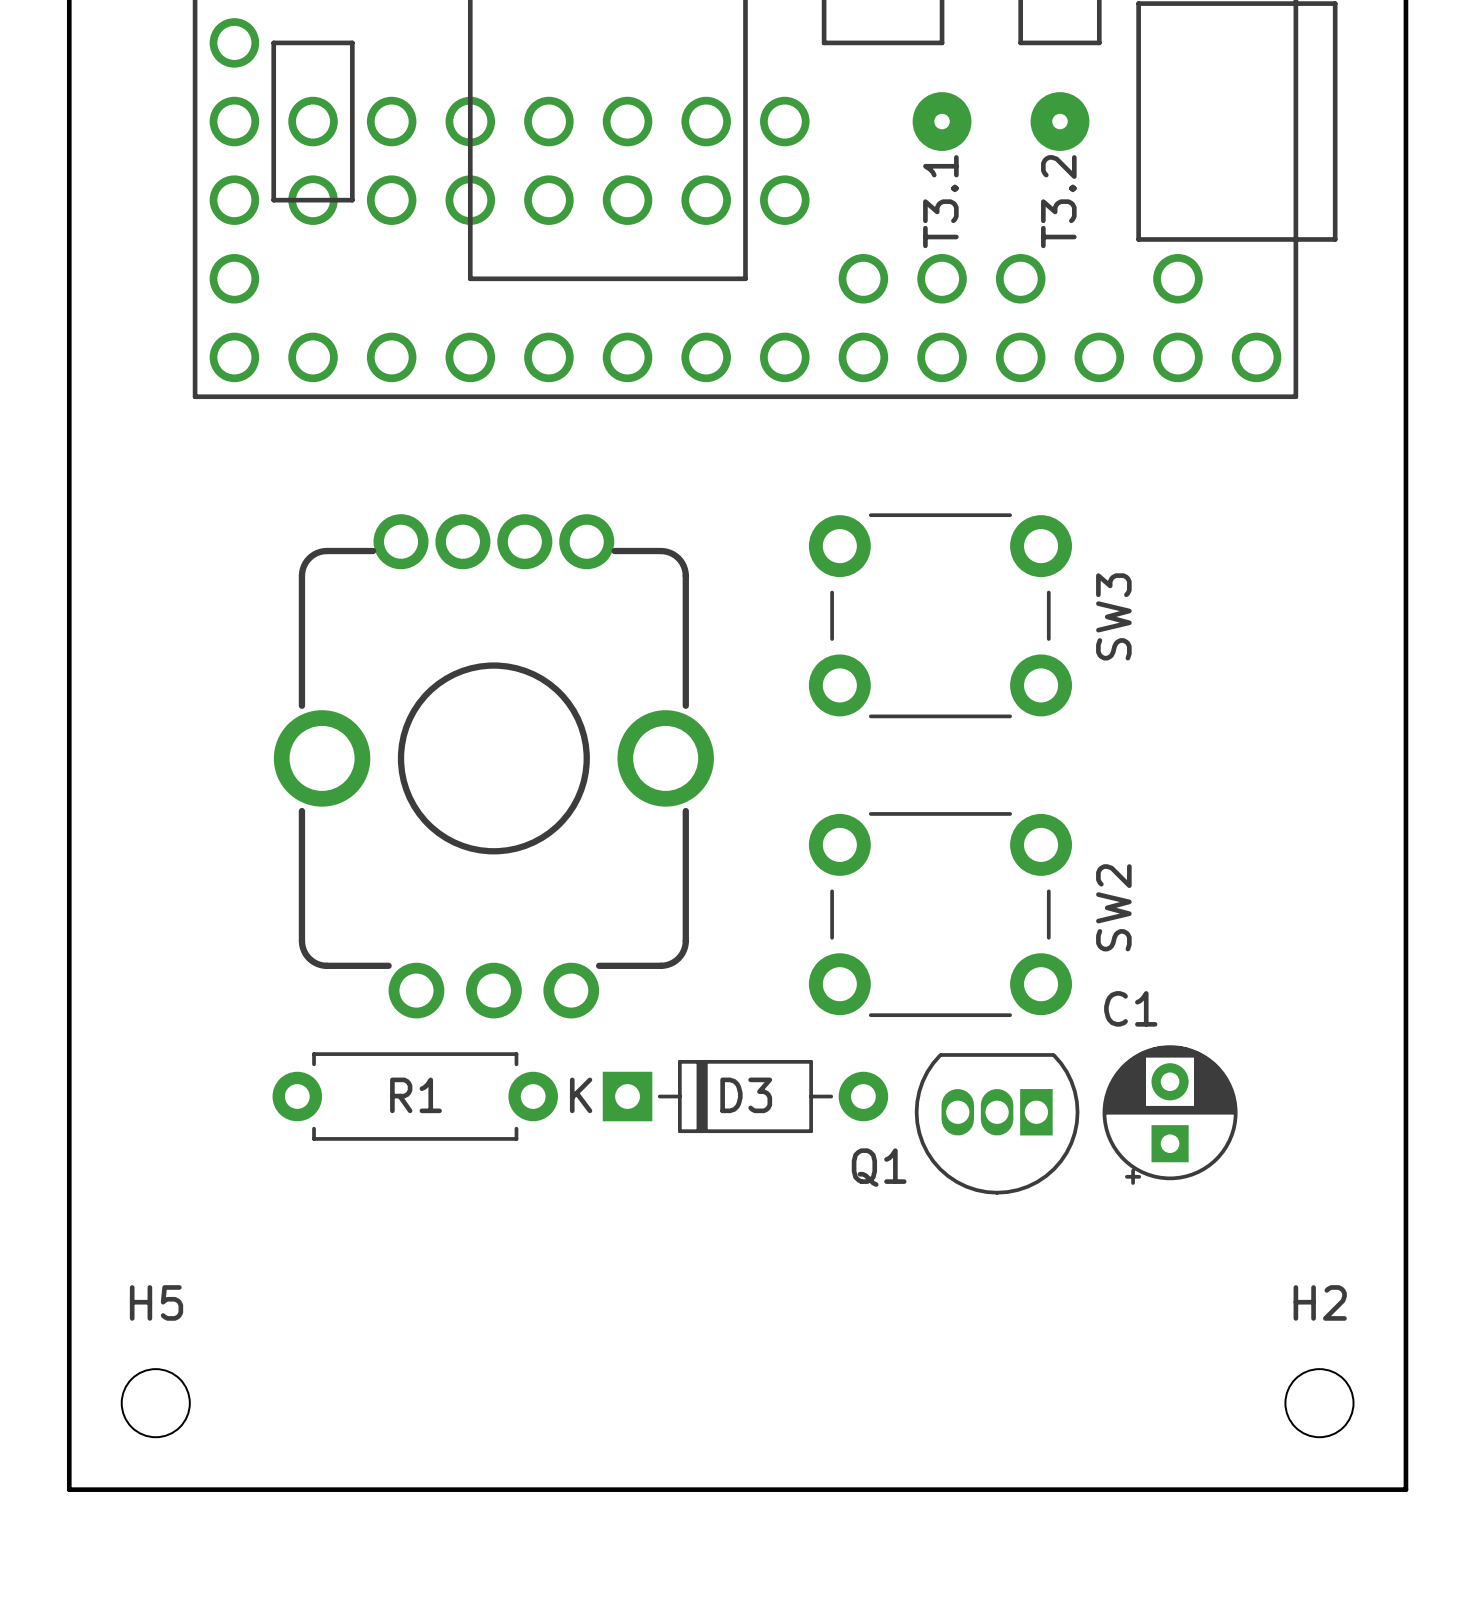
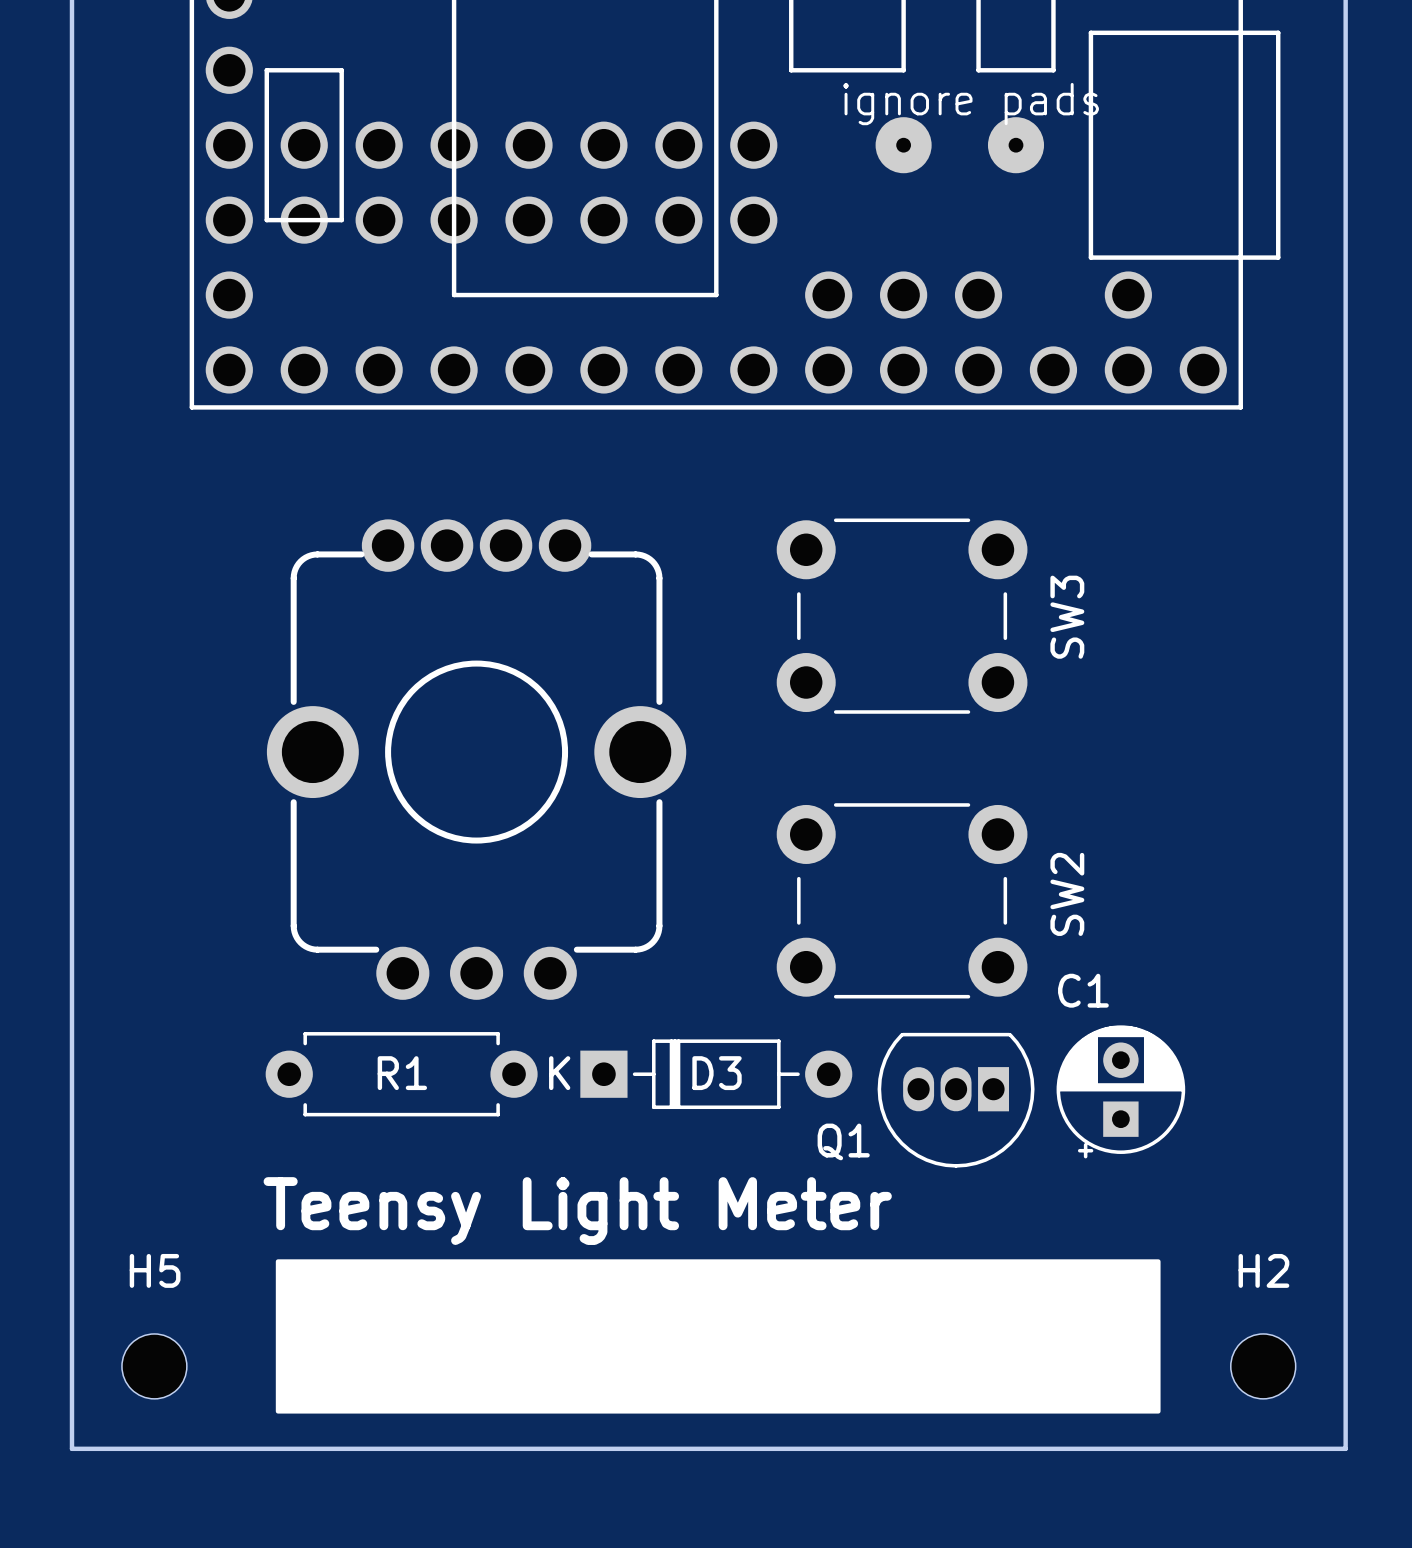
text: none -> ignore pads (971, 104)
part text: T3.1 (940, 201) -> none
part text: T3.2 (1058, 201) -> none
text: none -> Teensy Light Meter (577, 1211)
drawing: none -> [275, 1259, 1161, 1414]

